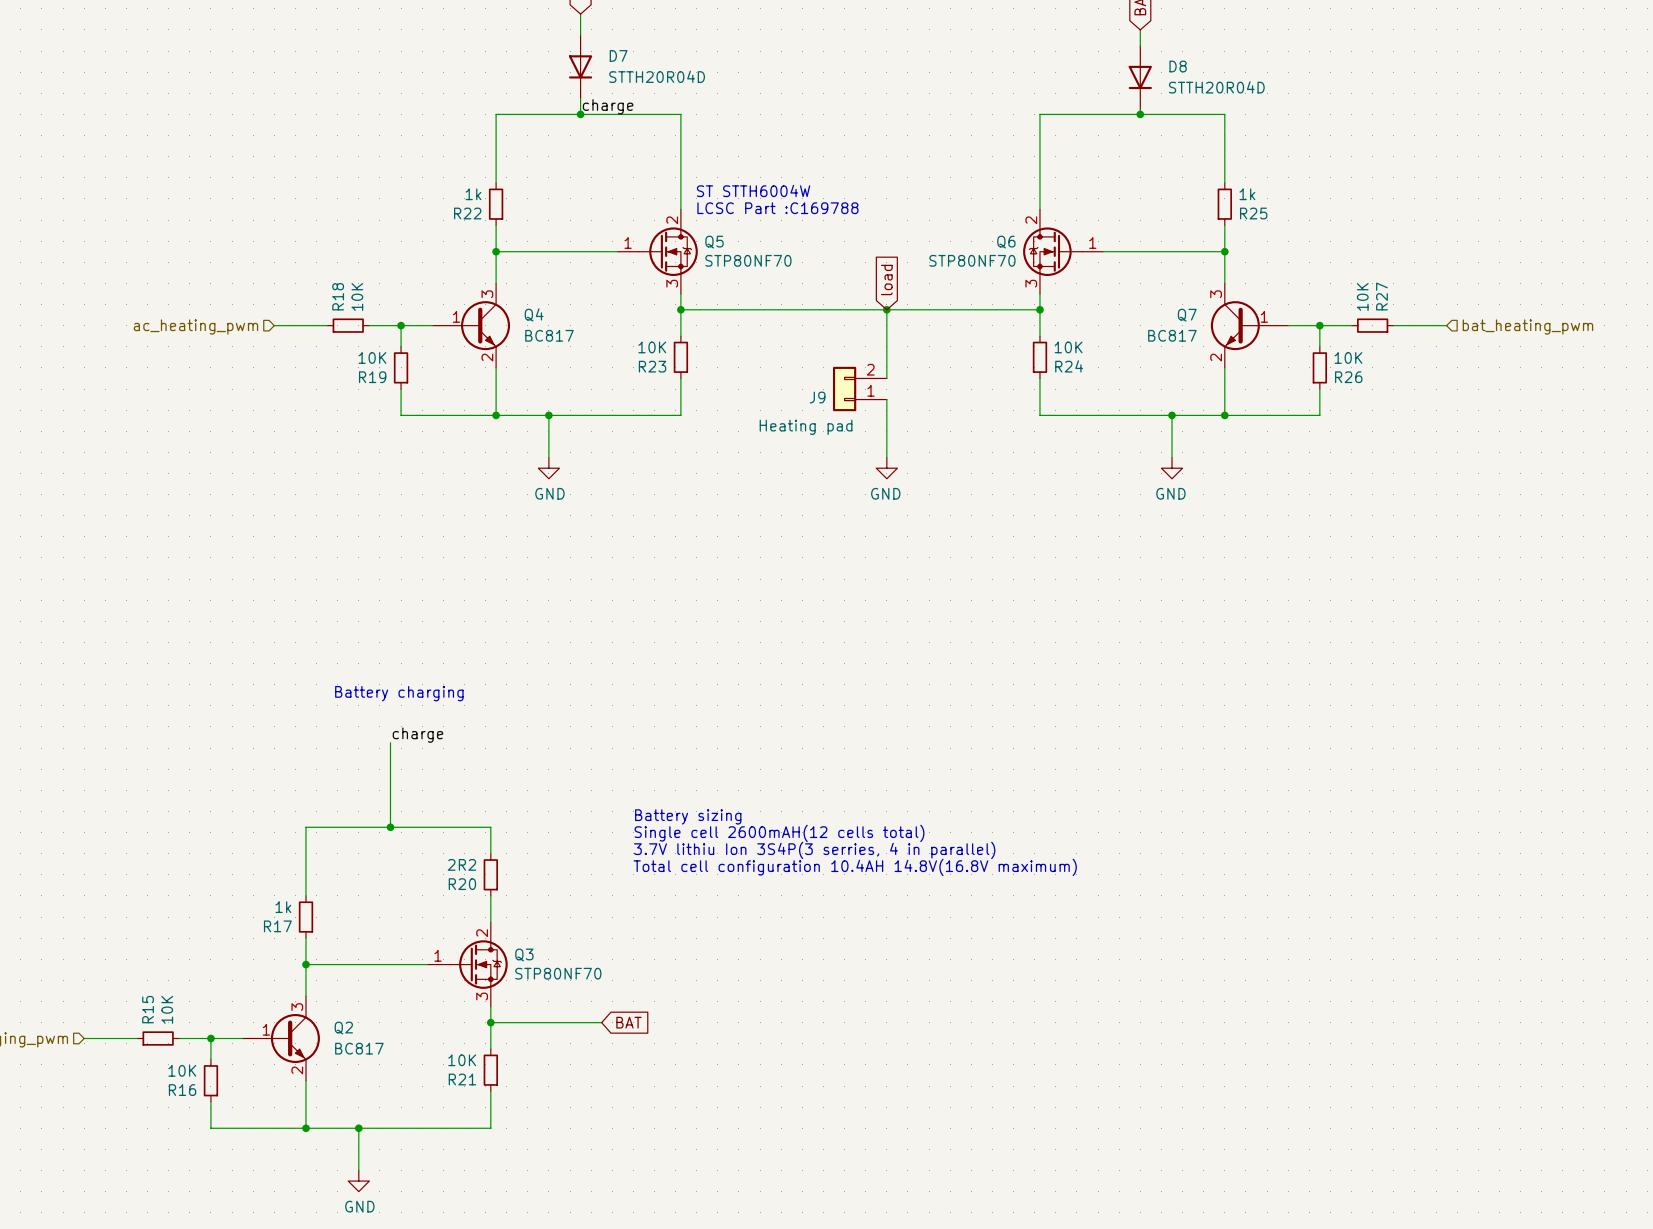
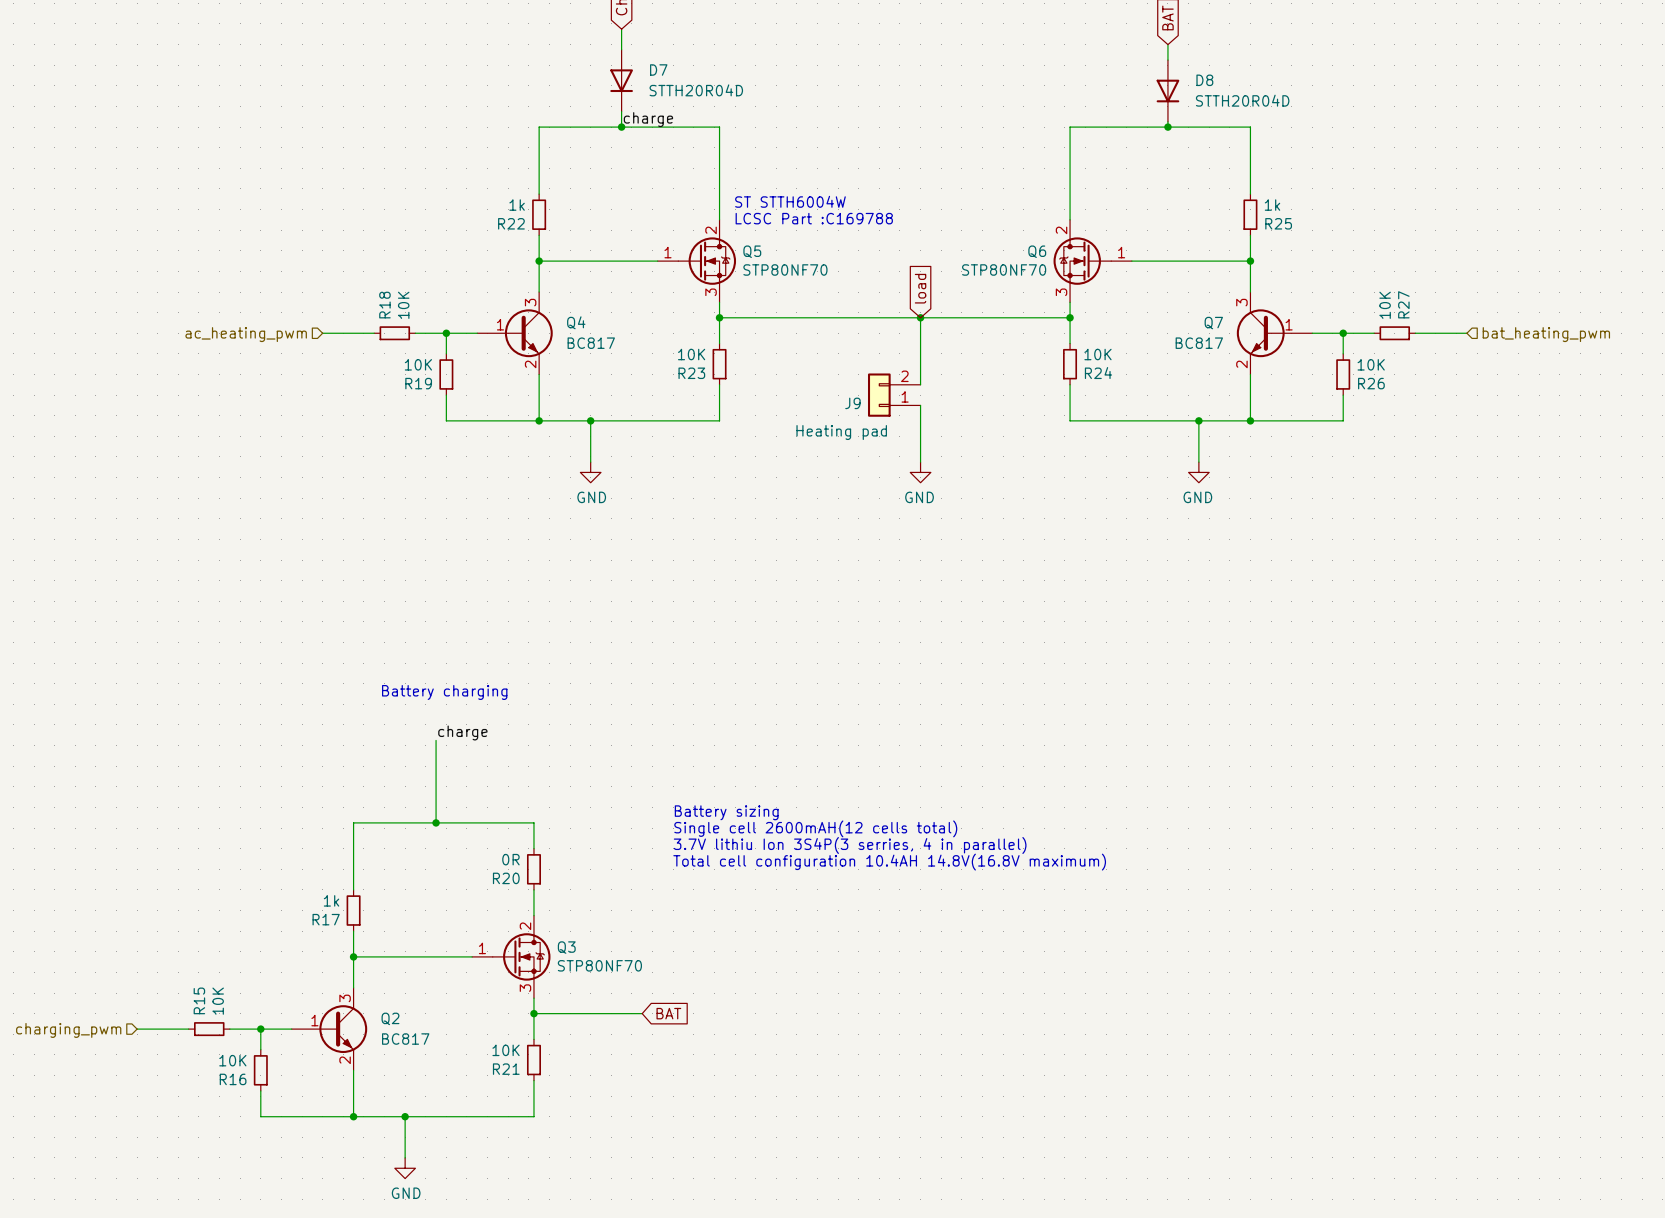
R20 value: 2R2 (461, 864) -> 0R (510, 859)

